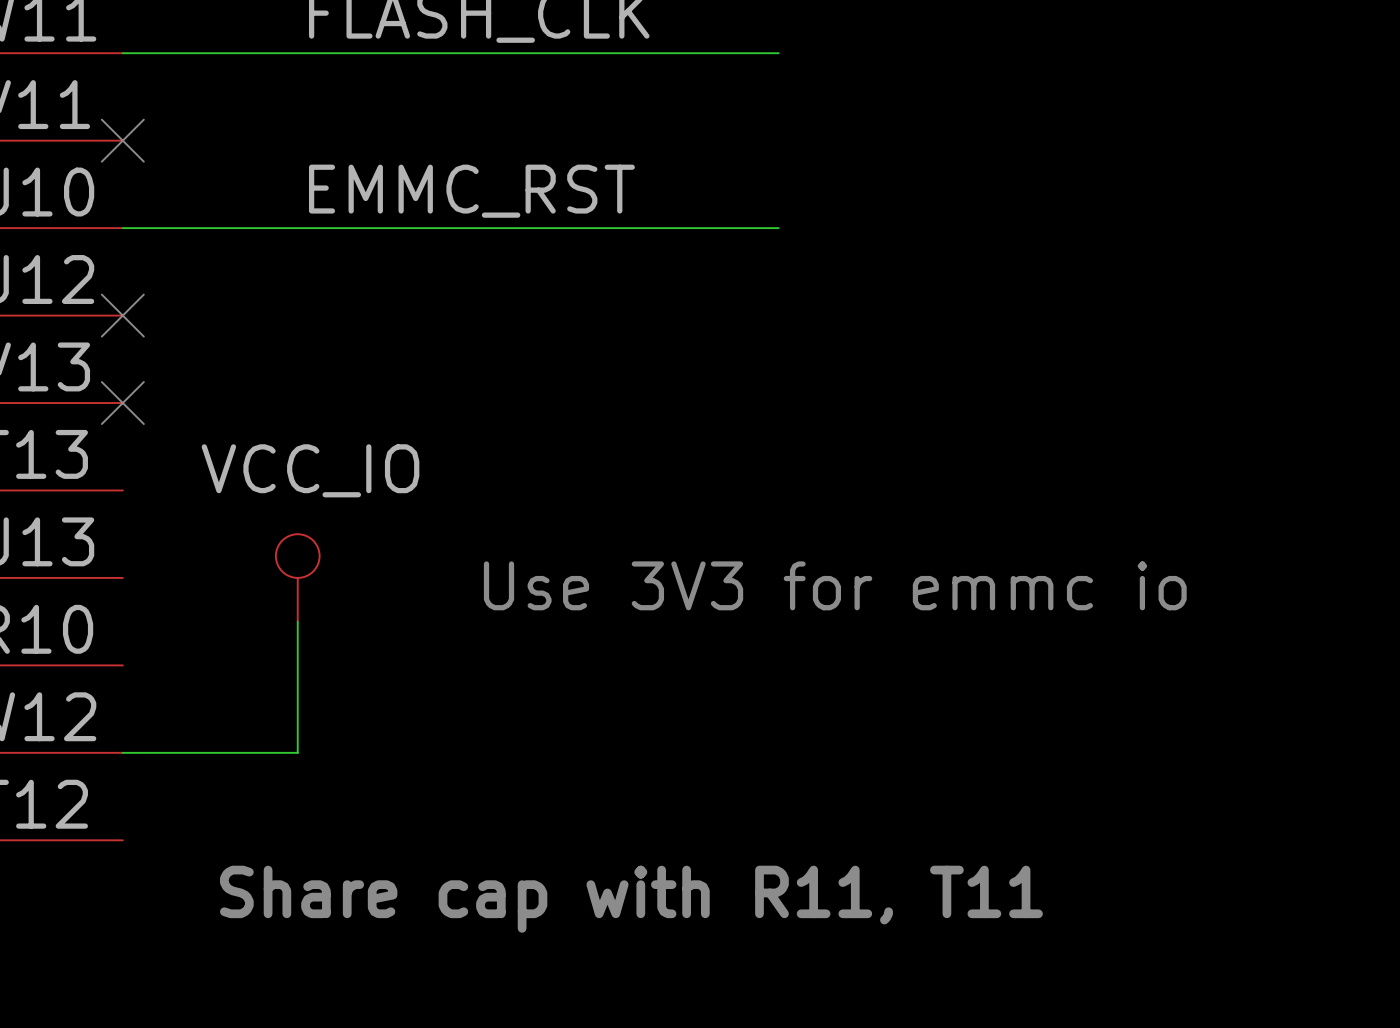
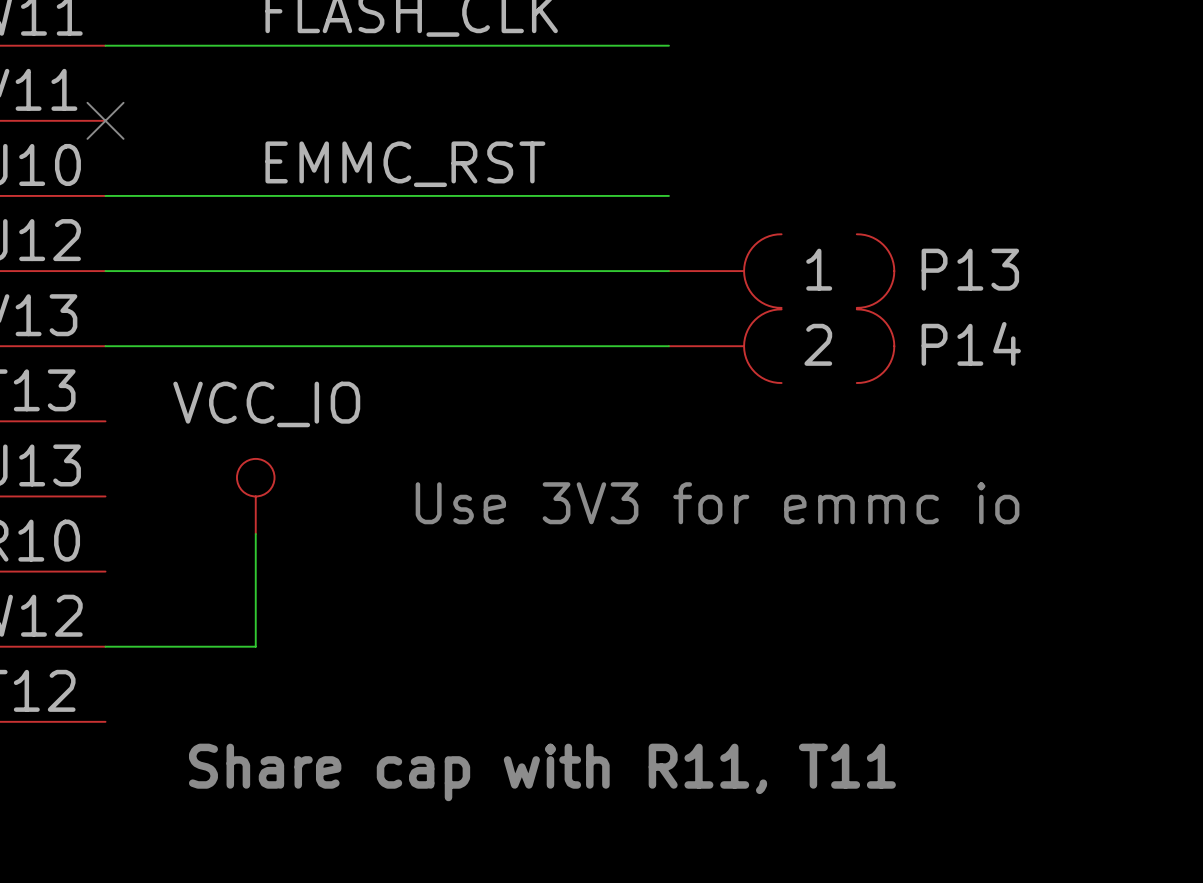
wire: none -> (105, 271) (668, 271)
no-connect mark: (122, 315) -> none
P13: none -> 1 (781, 271)
wire: none -> (105, 346) (668, 346)
no-connect mark: (122, 403) -> none
P14: none -> 2 (781, 346)

